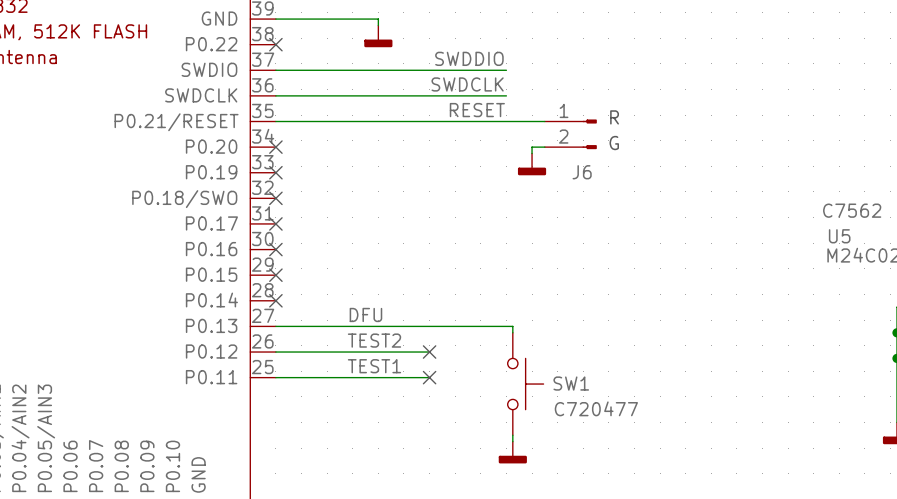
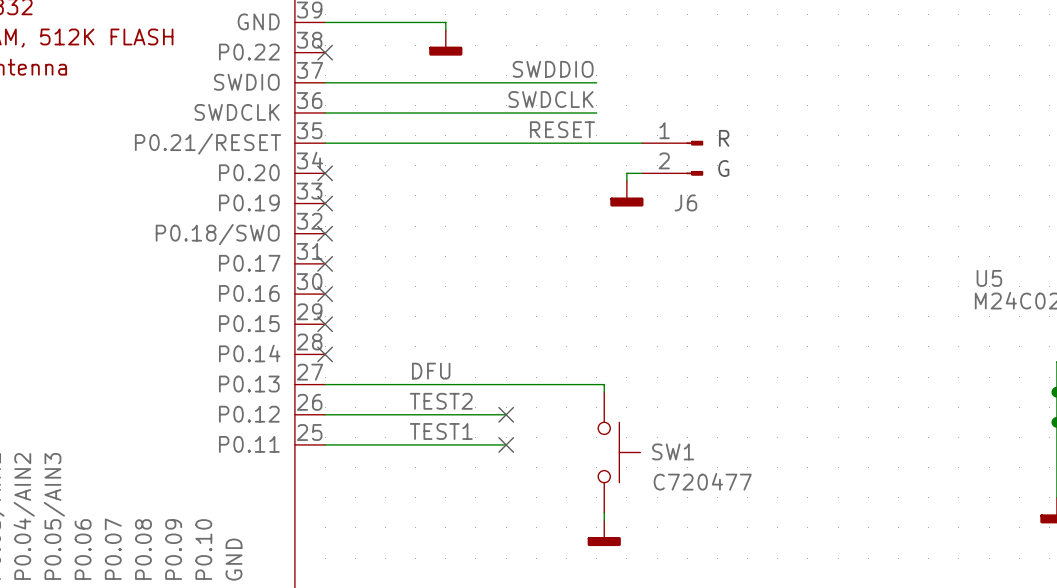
U5 text: C7562 (852, 210) -> none

